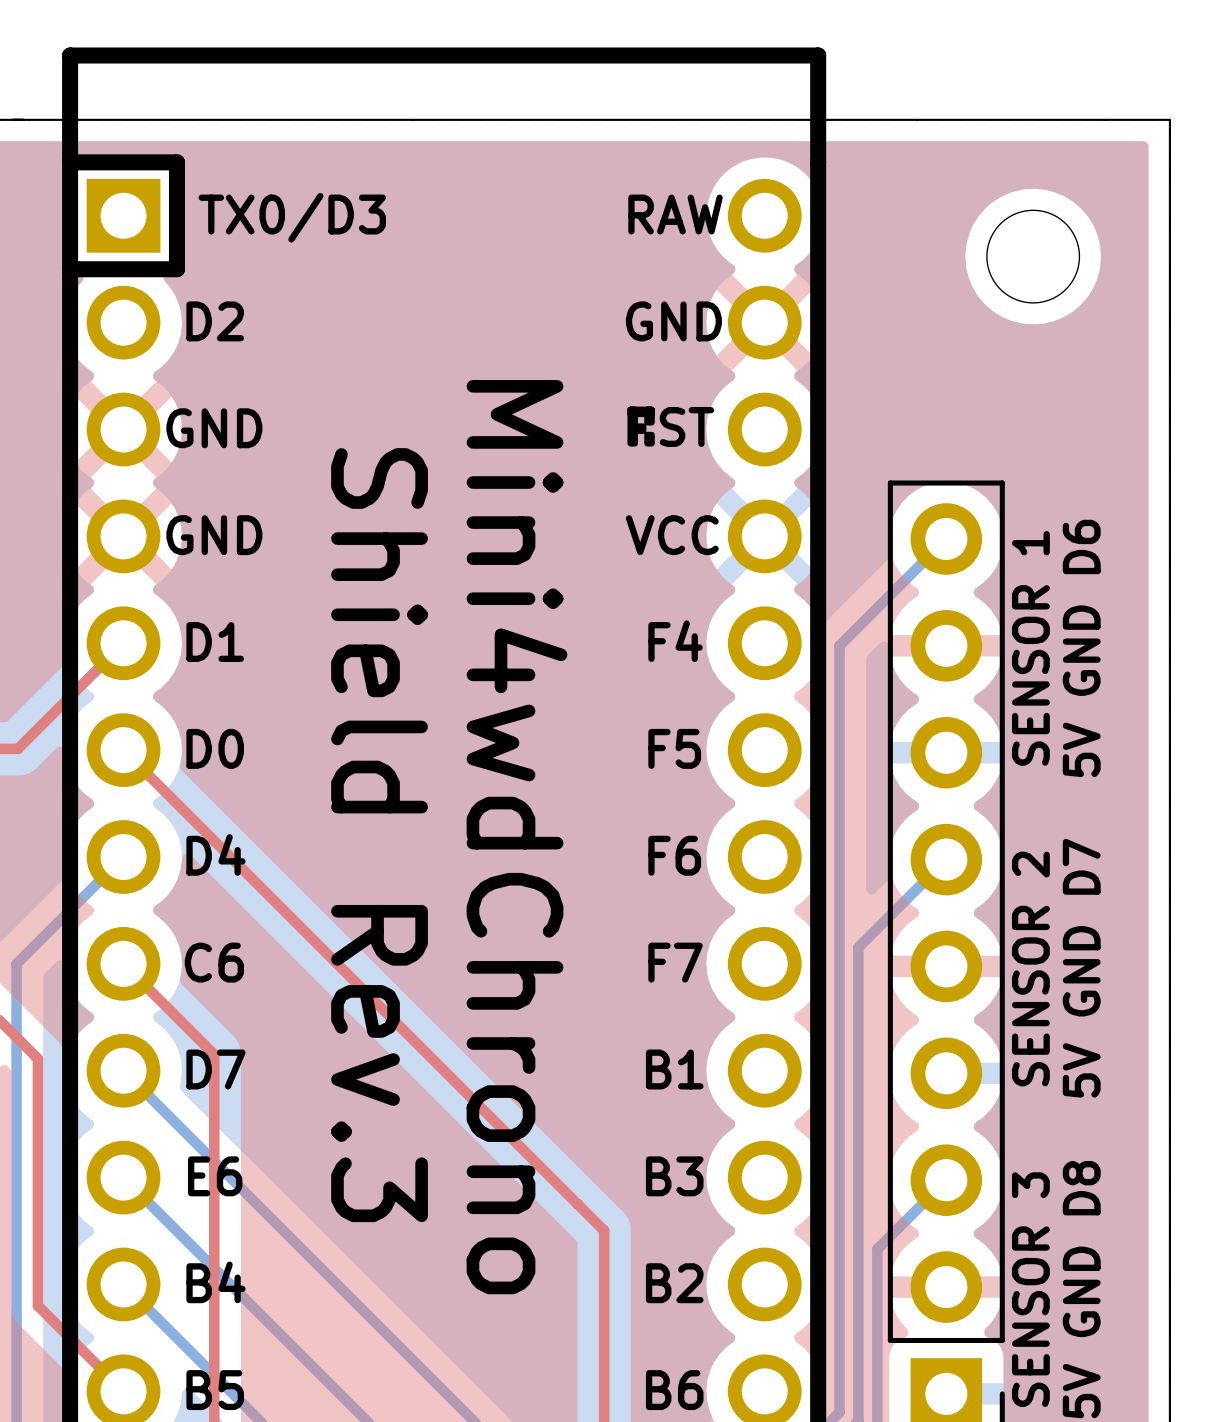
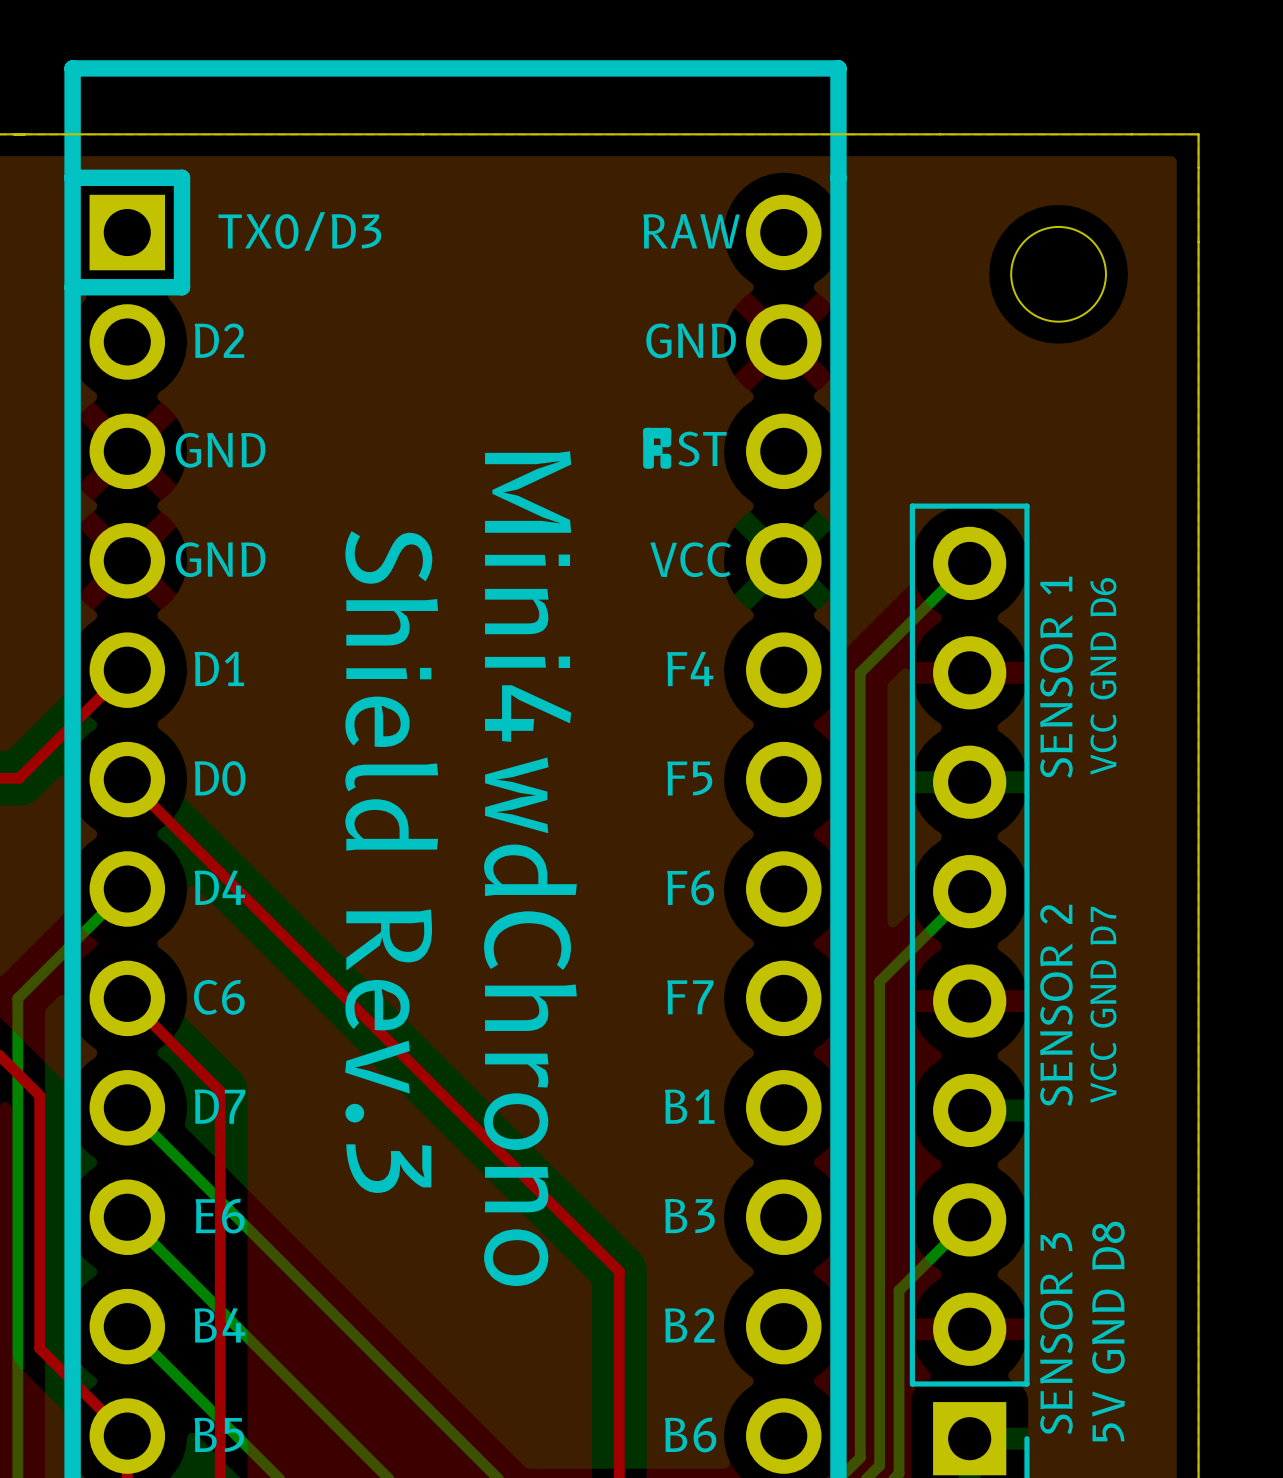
text: 5V GND D6 (1081, 648) -> VCC GND D6 (1103, 676)
text: 5V GND D7 (1081, 968) -> VCC GND D7 (1103, 1004)

